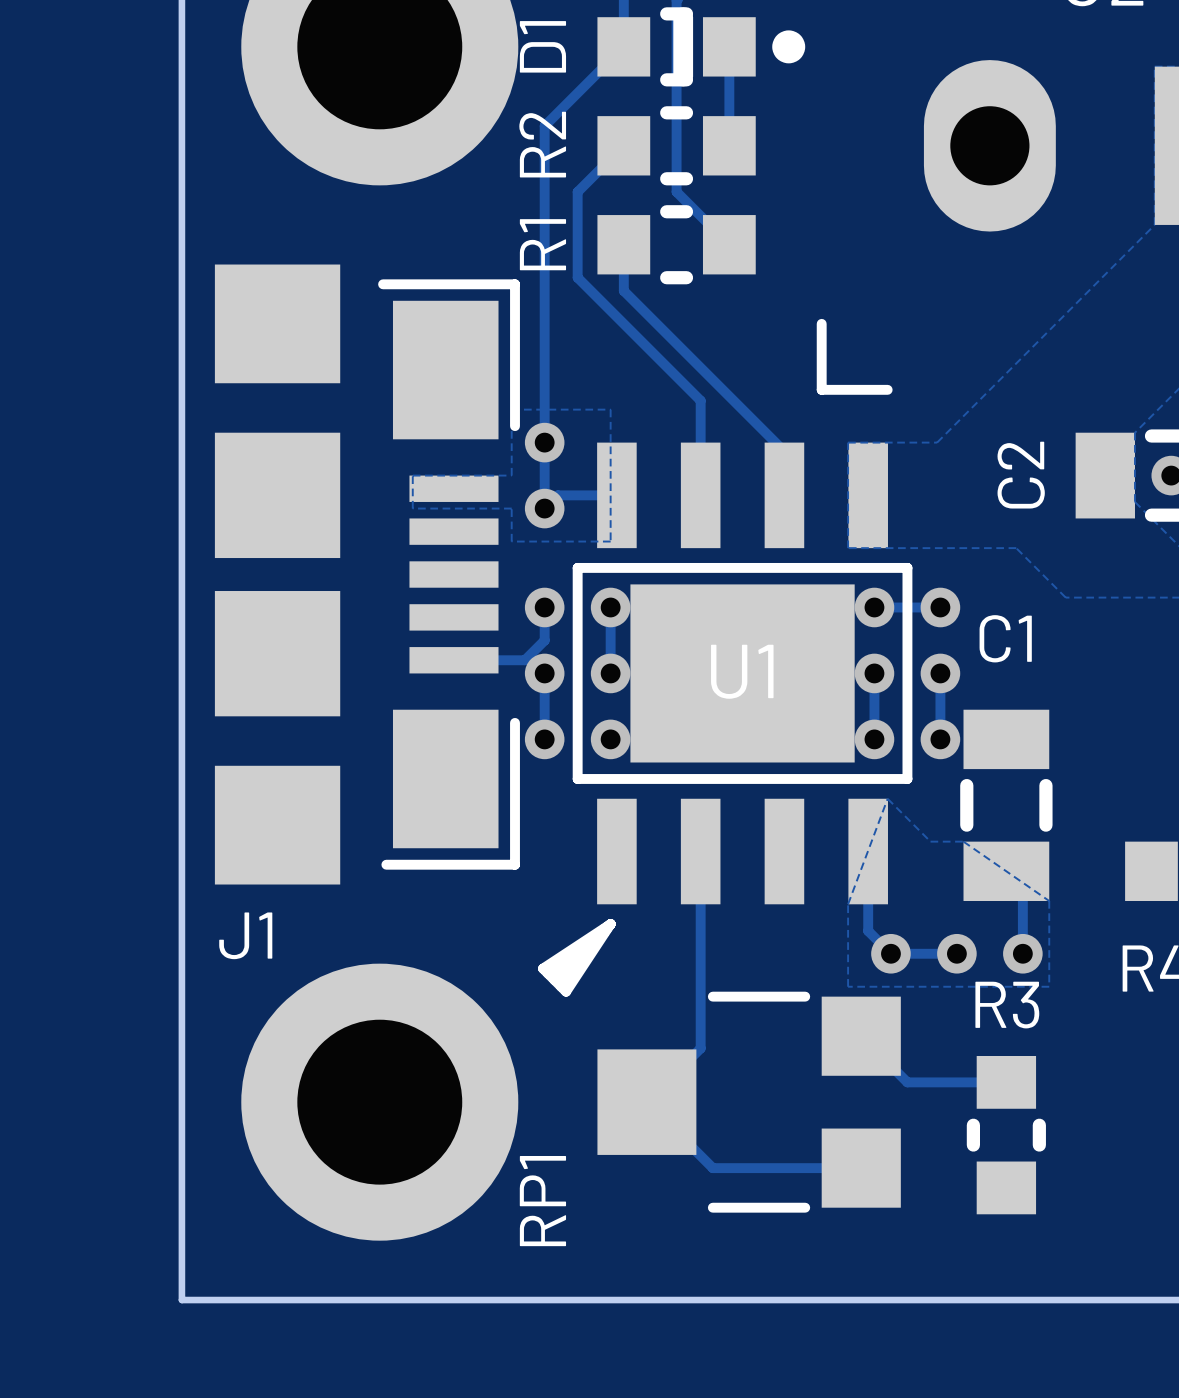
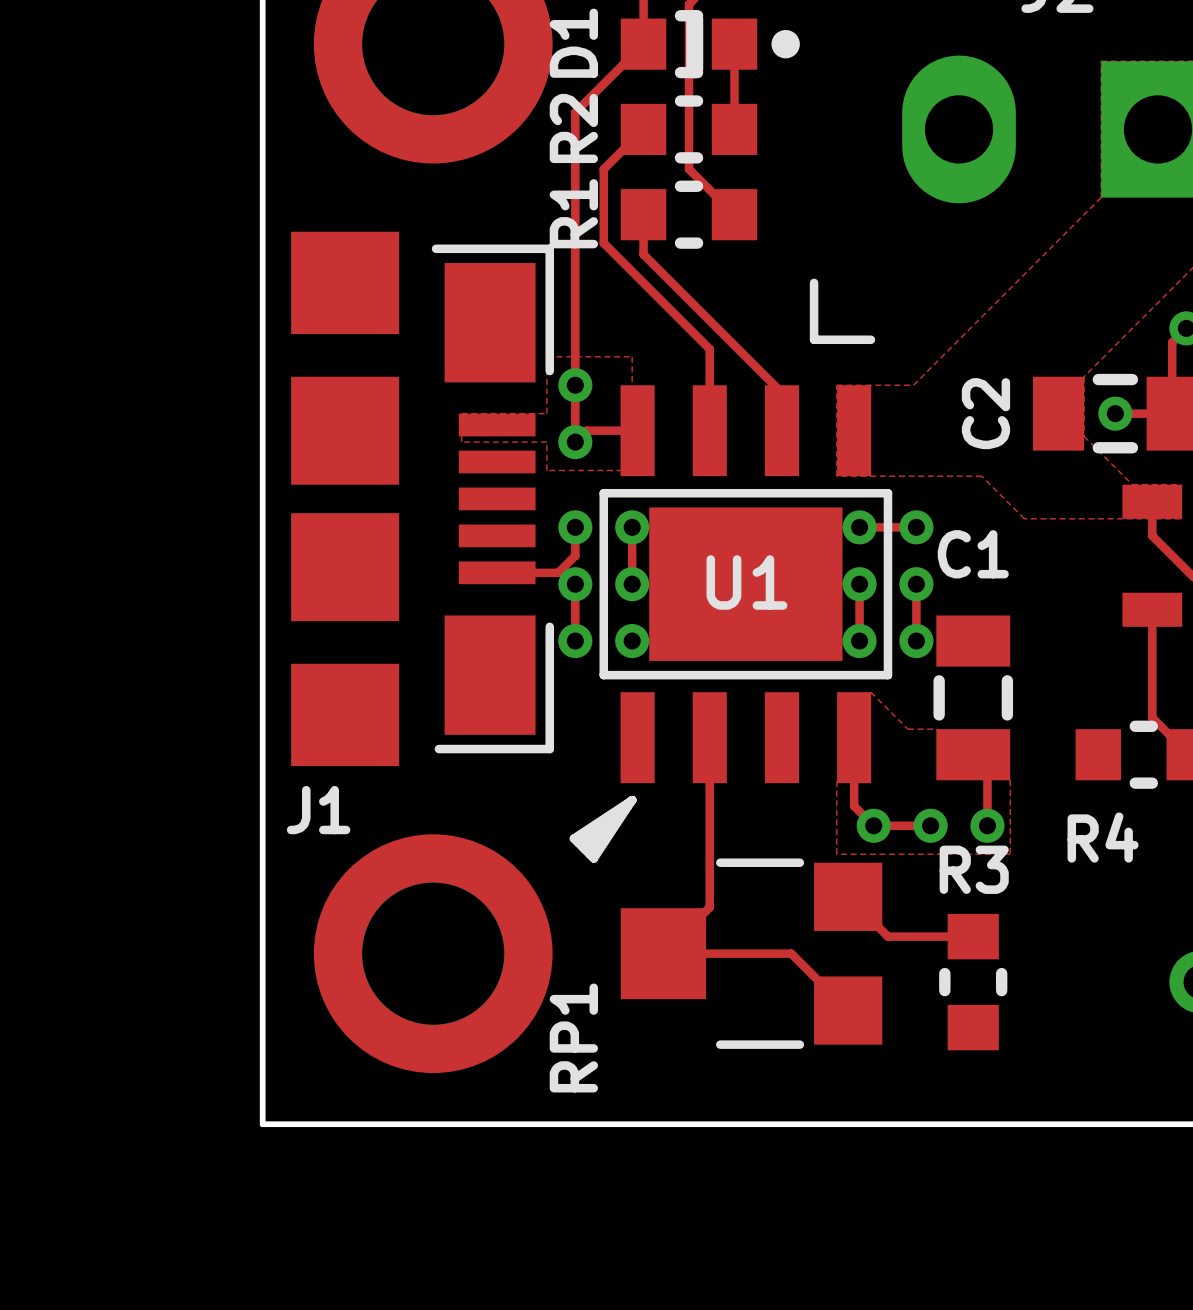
track: (646, 1102) (712, 1168) (861, 1168) -> (663, 953) (791, 953) (848, 1010)

